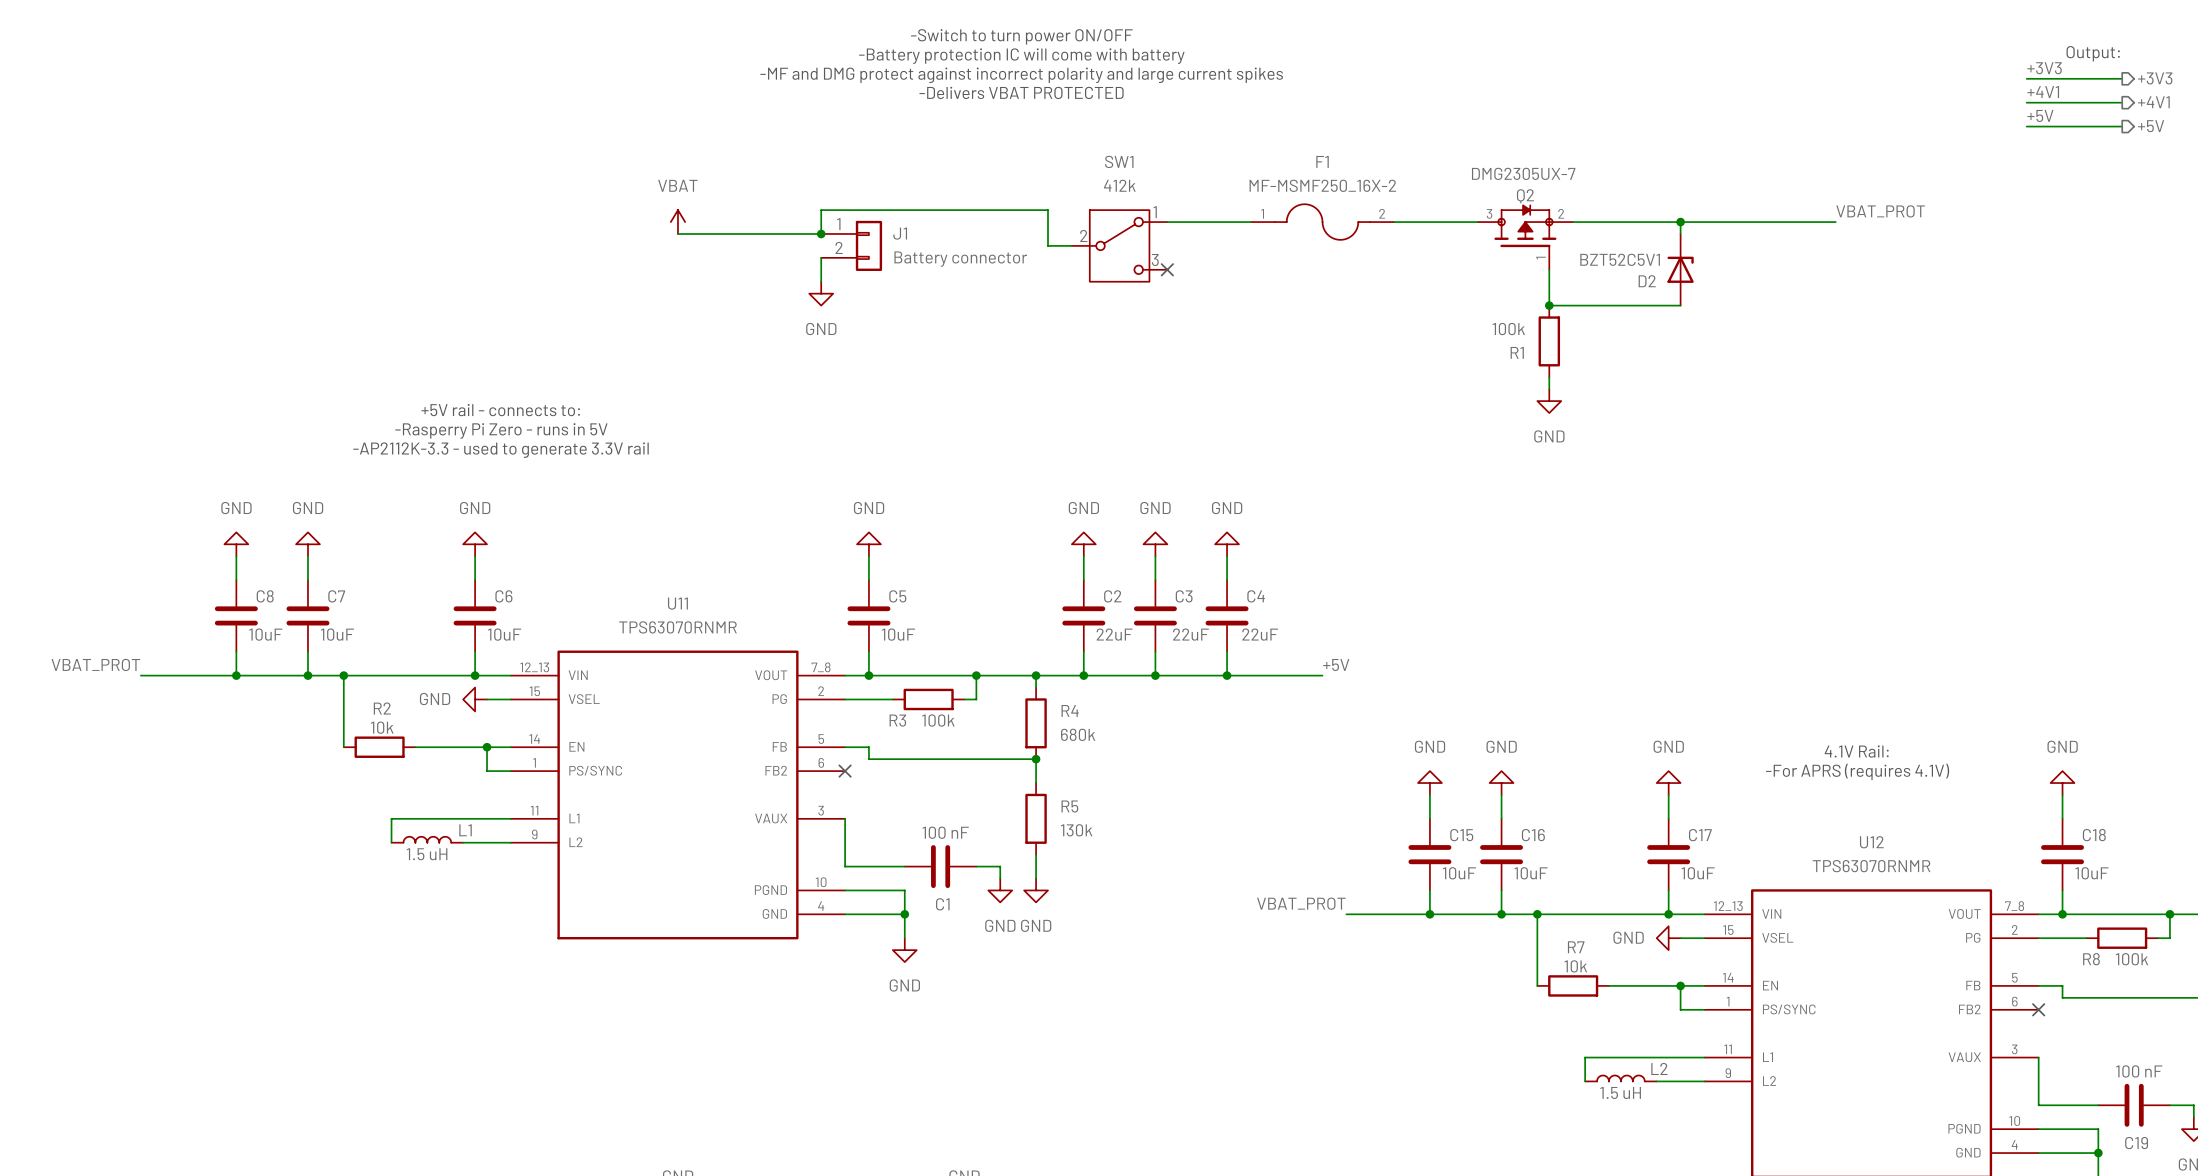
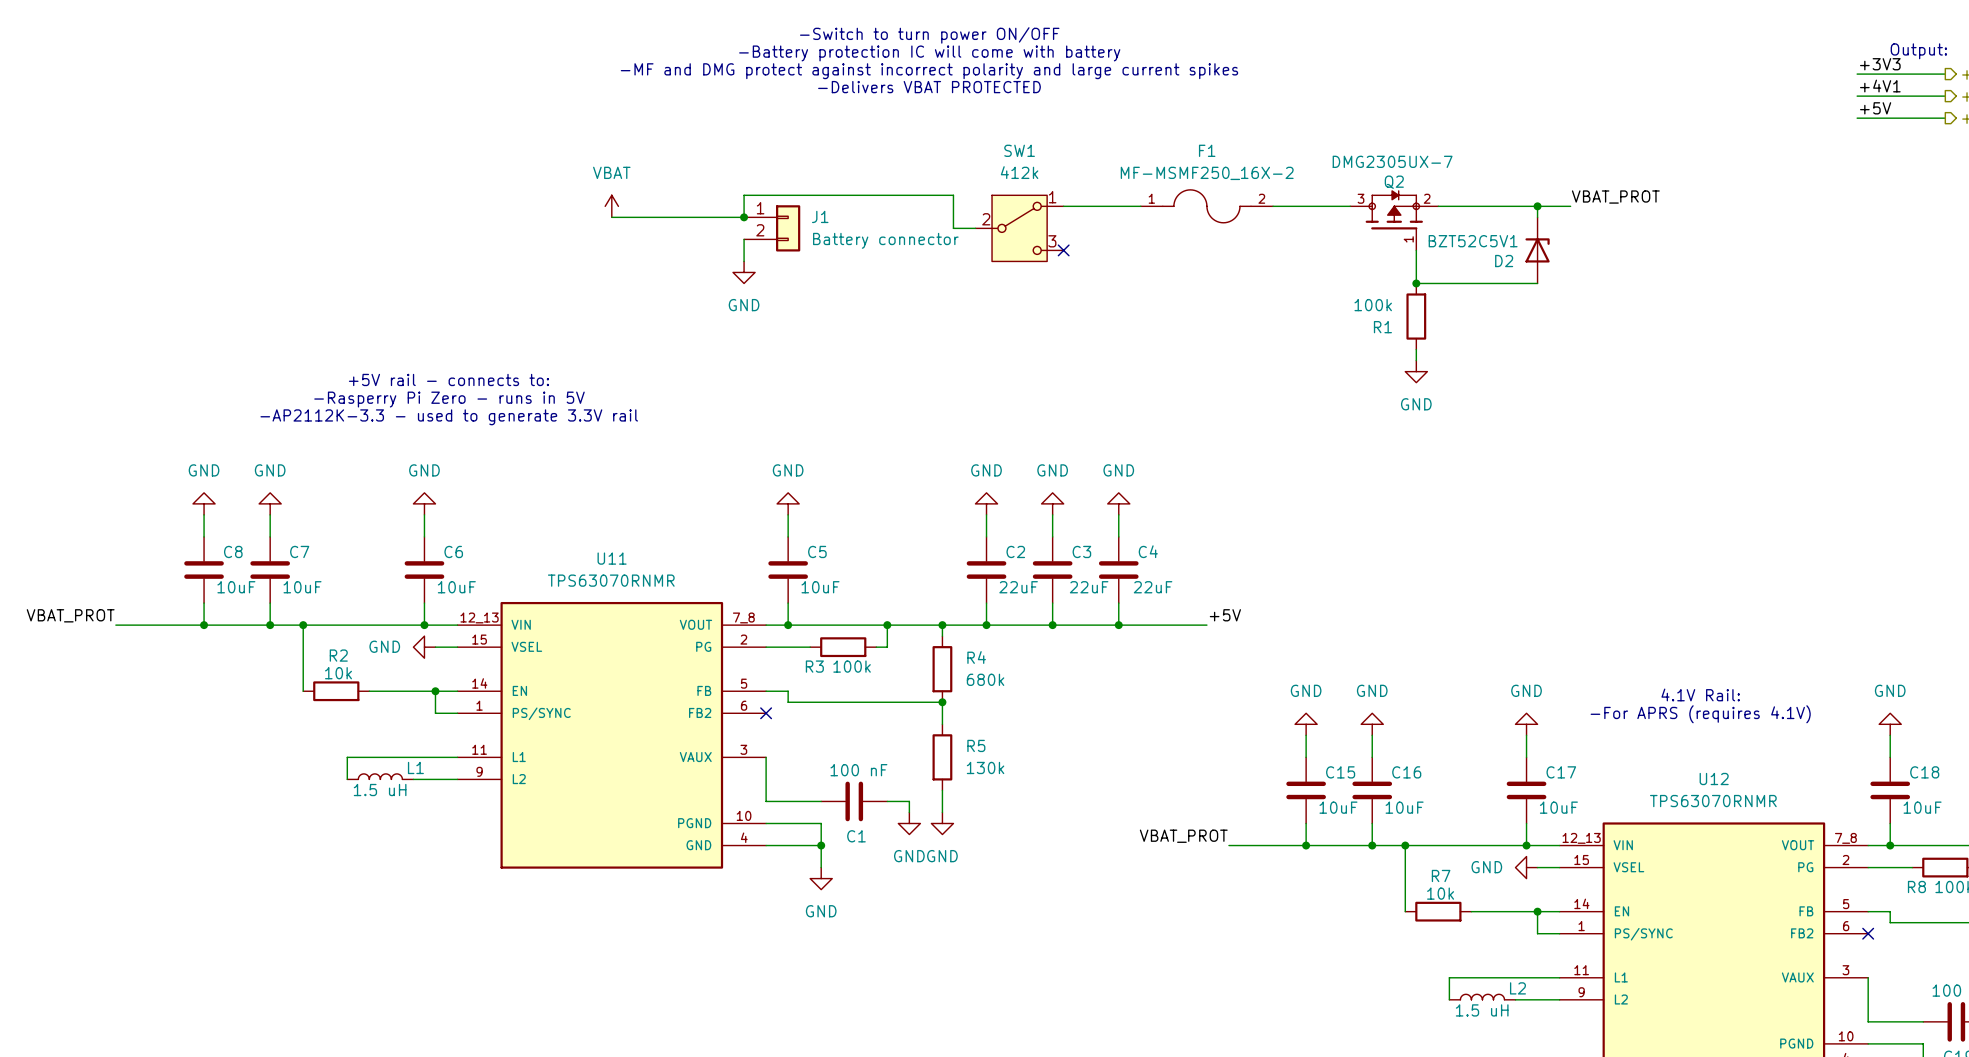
label position: VBAT_PROT (1880, 211) -> VBAT_PROT (1615, 197)
wire: (1716, 222) (1835, 222) -> none

